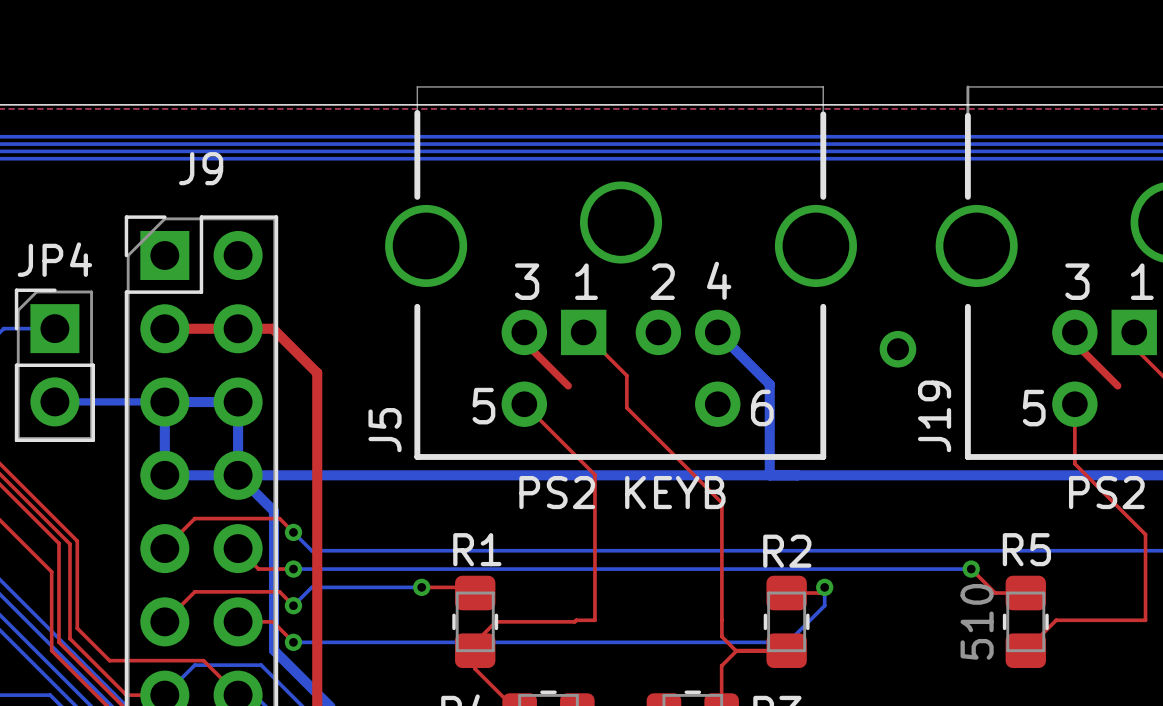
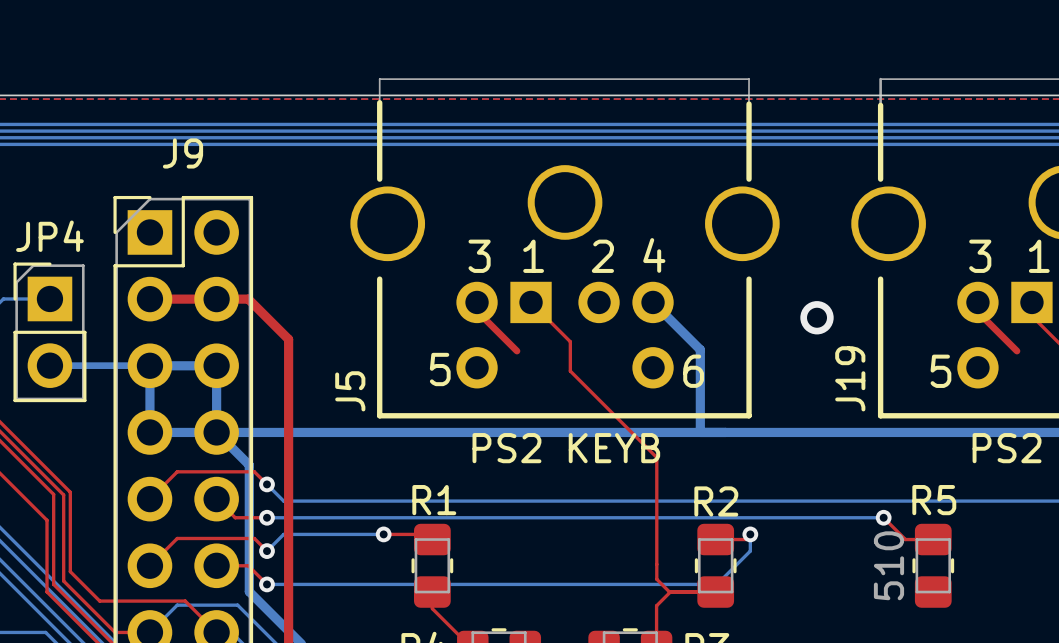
top track: (524, 404) (594, 474) (594, 620) (495, 621) (475, 642) (475, 650) -> none
top track: (1074, 404) (1074, 463) (1145, 534) (1145, 620) (1056, 620) (1025, 650) -> none

